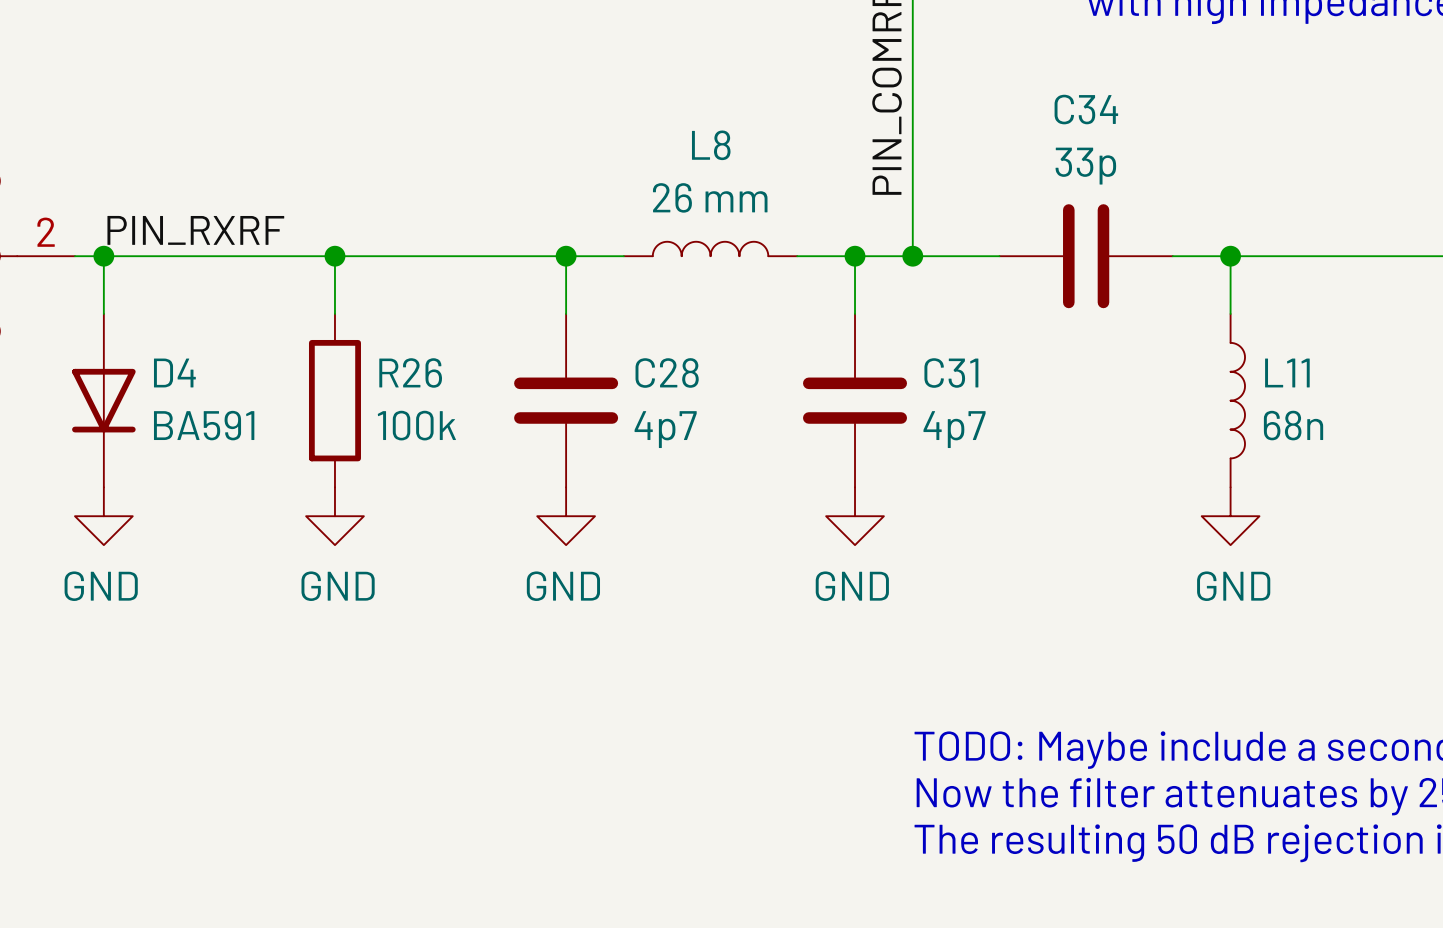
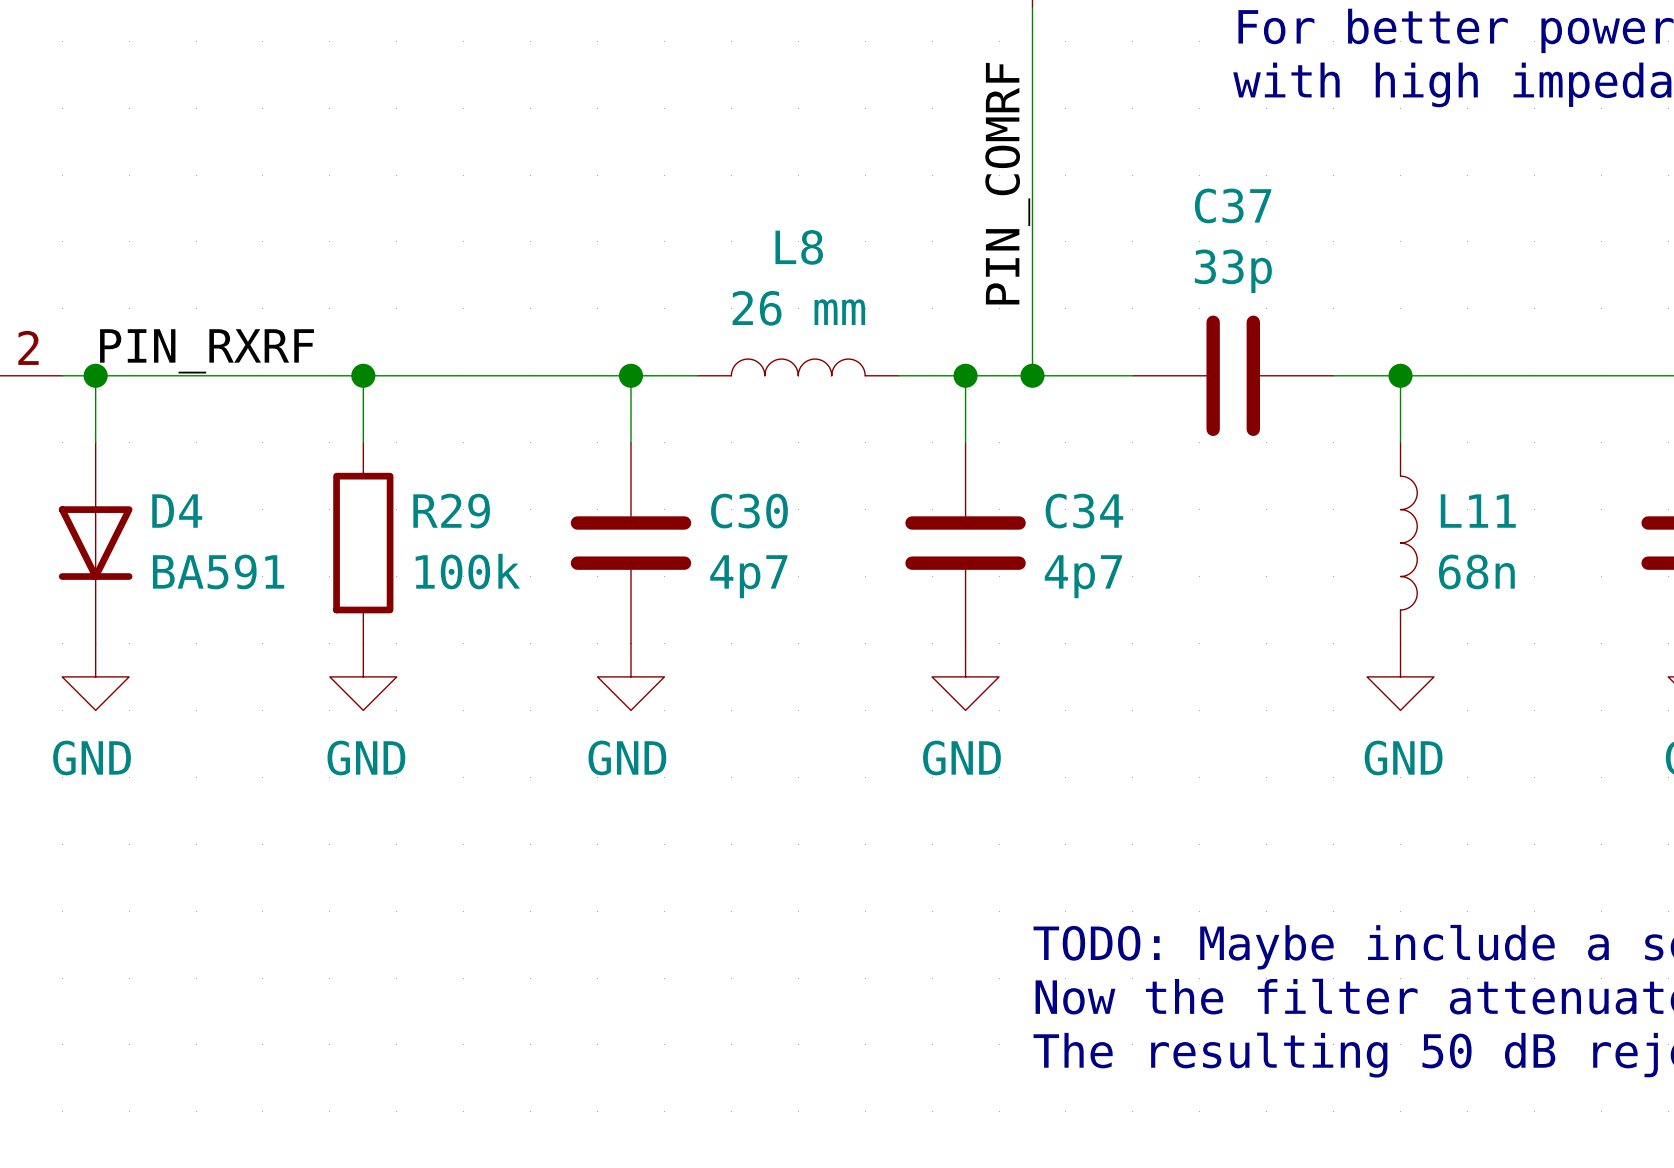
C34 name: C34 (1086, 109) -> C37 (1233, 205)
R26 name: R26 (410, 372) -> R29 (451, 511)
C28 name: C28 (667, 372) -> C30 (749, 511)
C31 name: C31 (951, 373) -> C34 (1084, 511)

